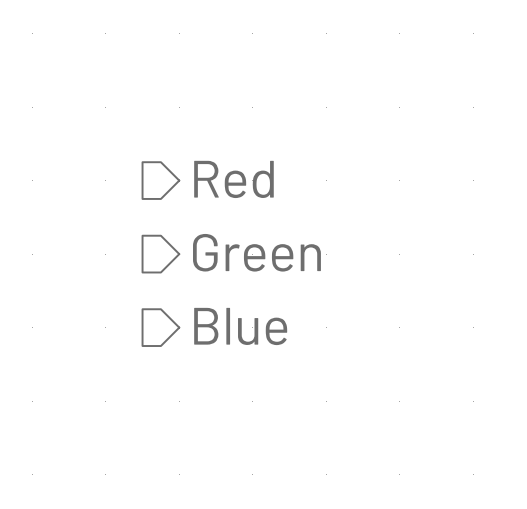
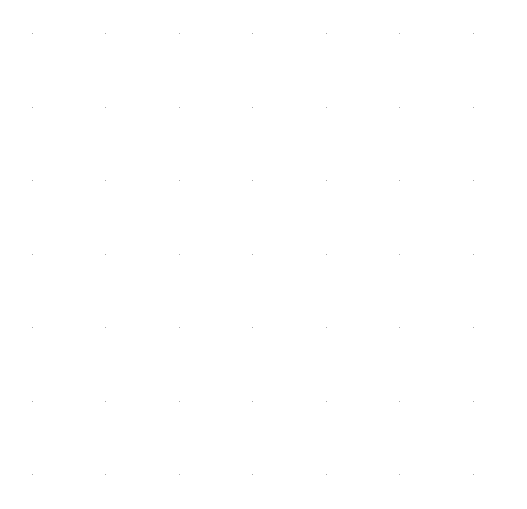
hierarchical label: Red (233, 179) -> none
hierarchical label: Green (256, 252) -> none
hierarchical label: Blue (240, 326) -> none

